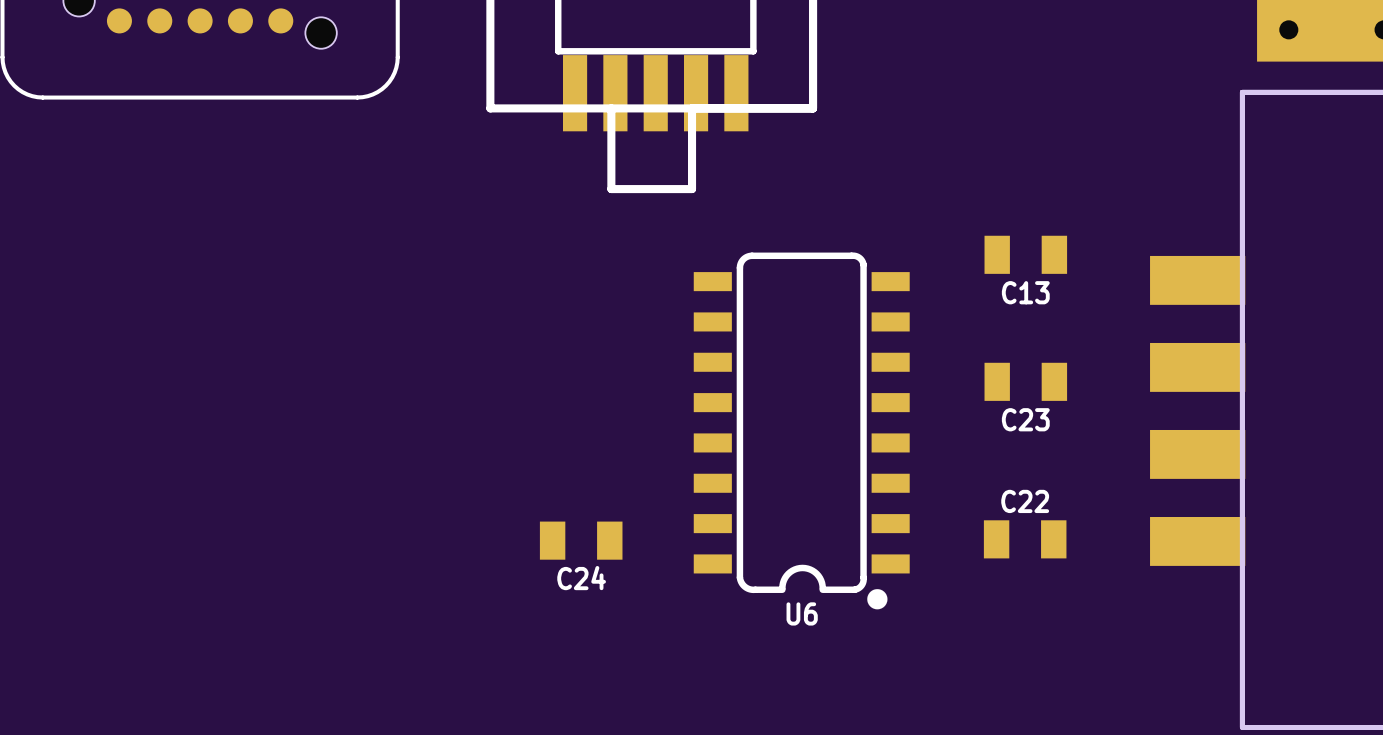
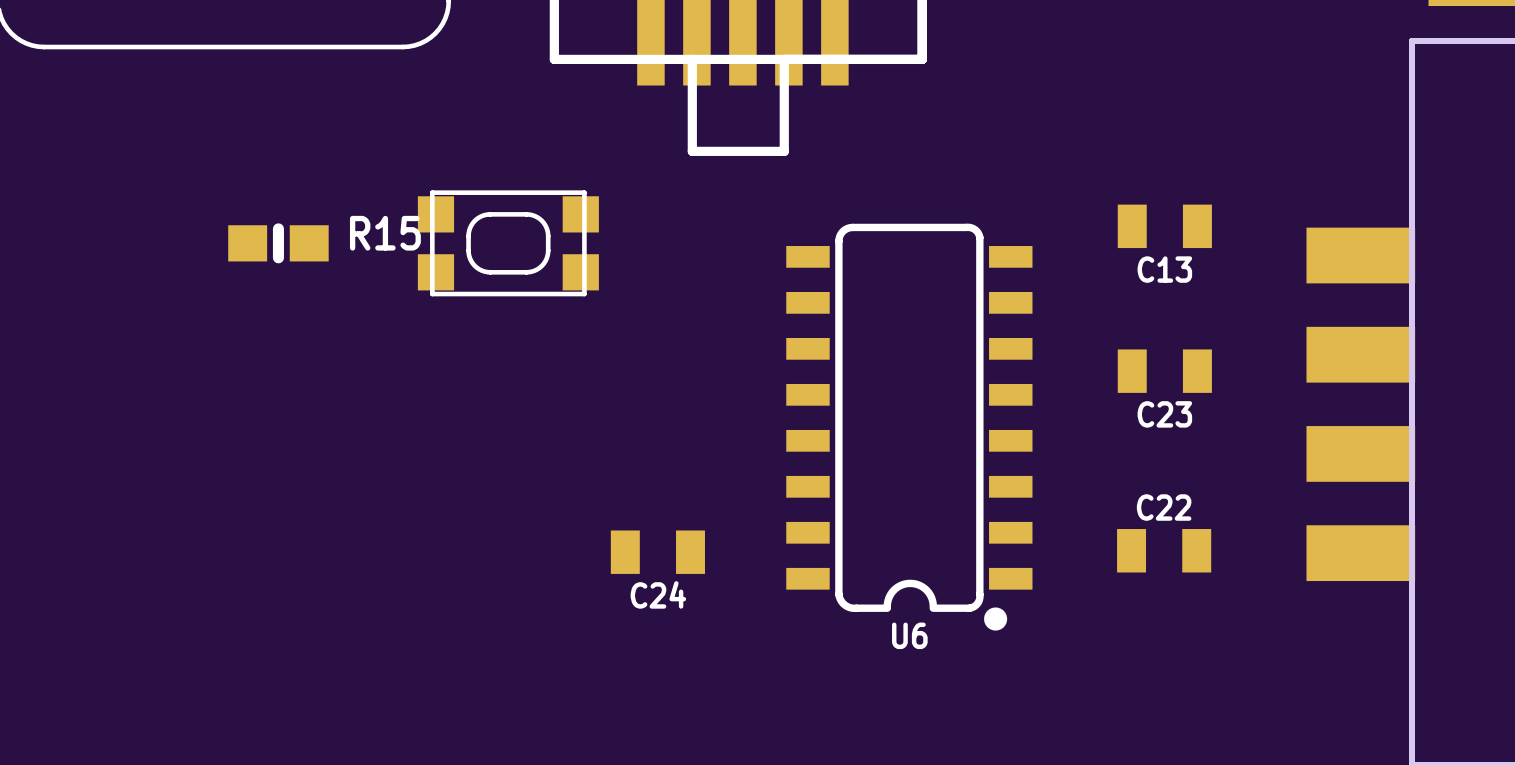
R15: none -> (278, 243)
part: none -> (508, 243)

